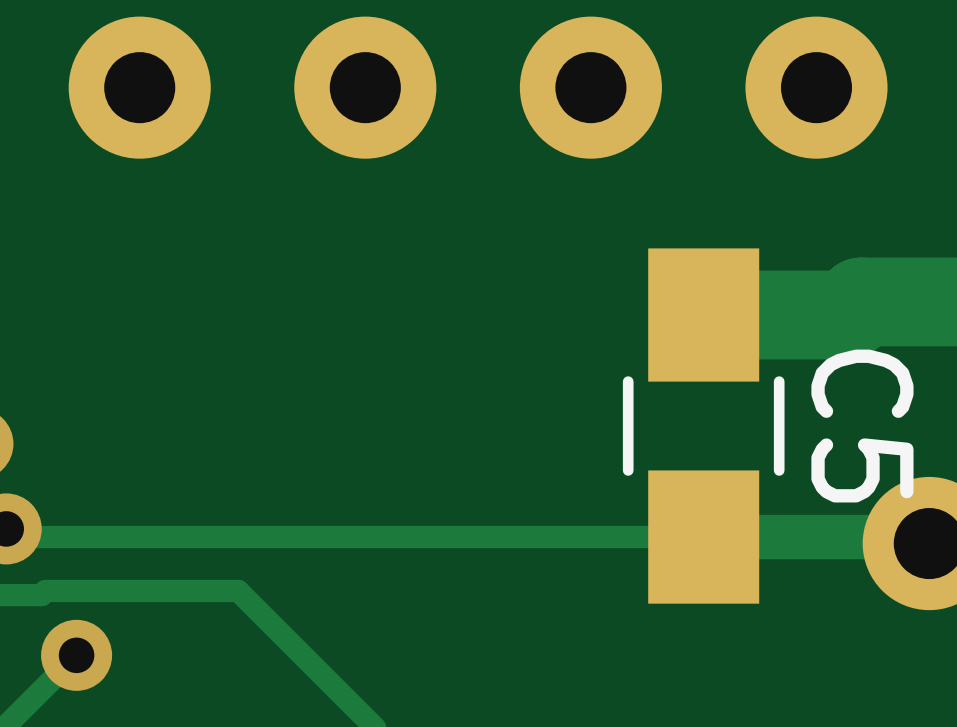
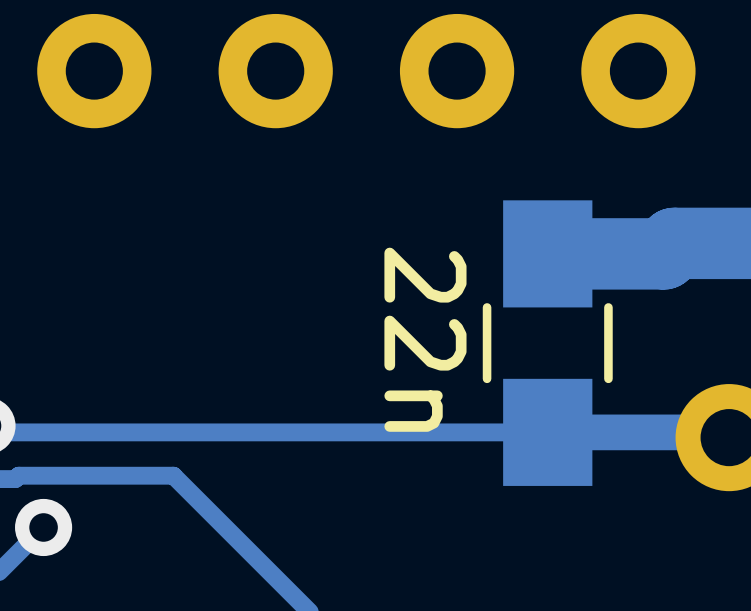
C5 value: none -> 22n (425, 339)
C5 name: C5 (862, 426) -> none

